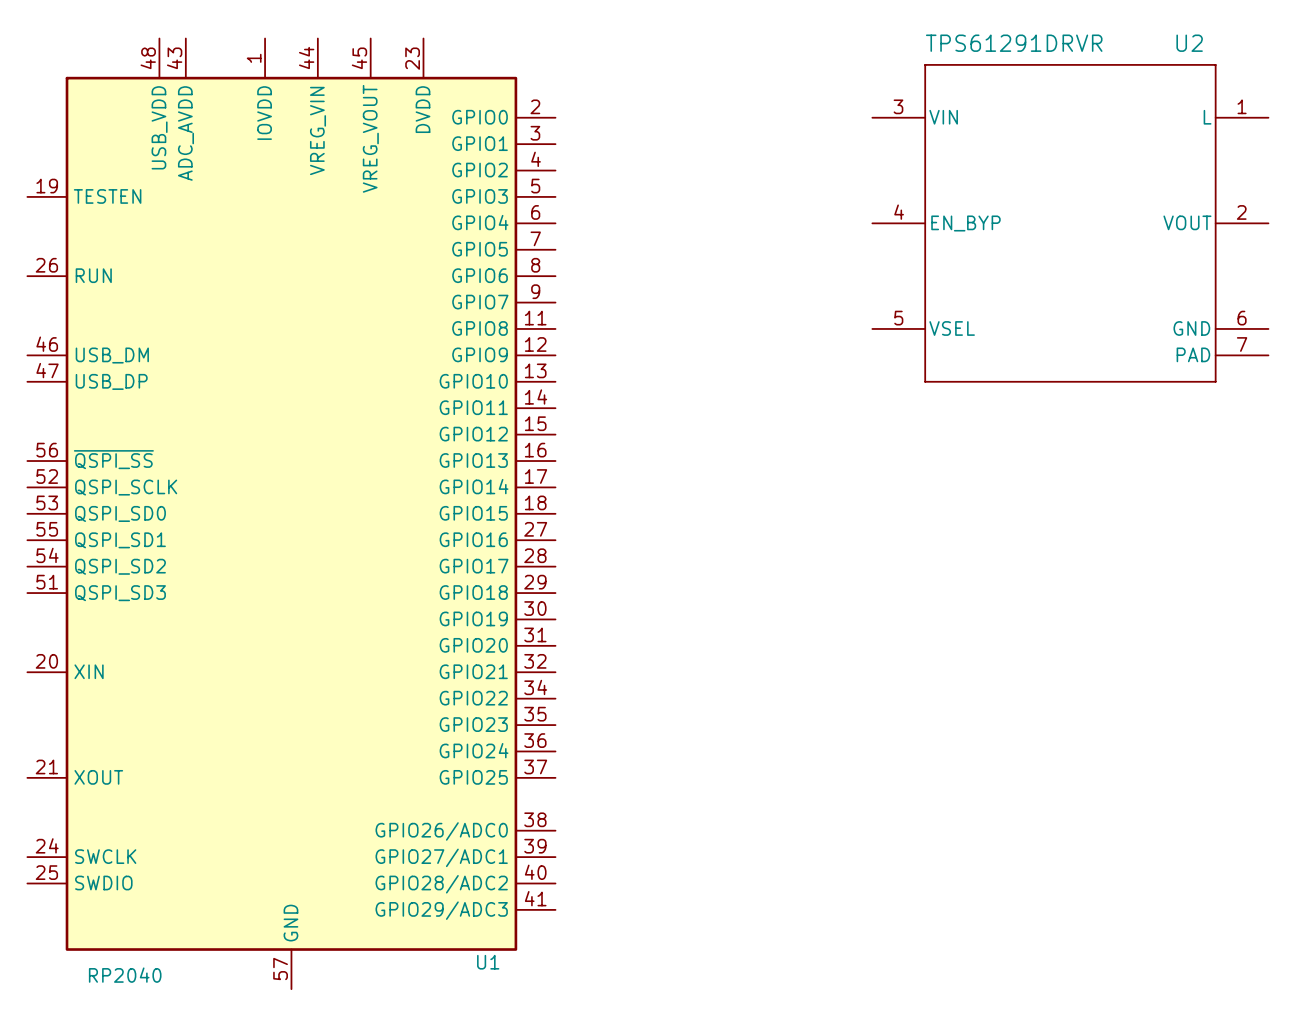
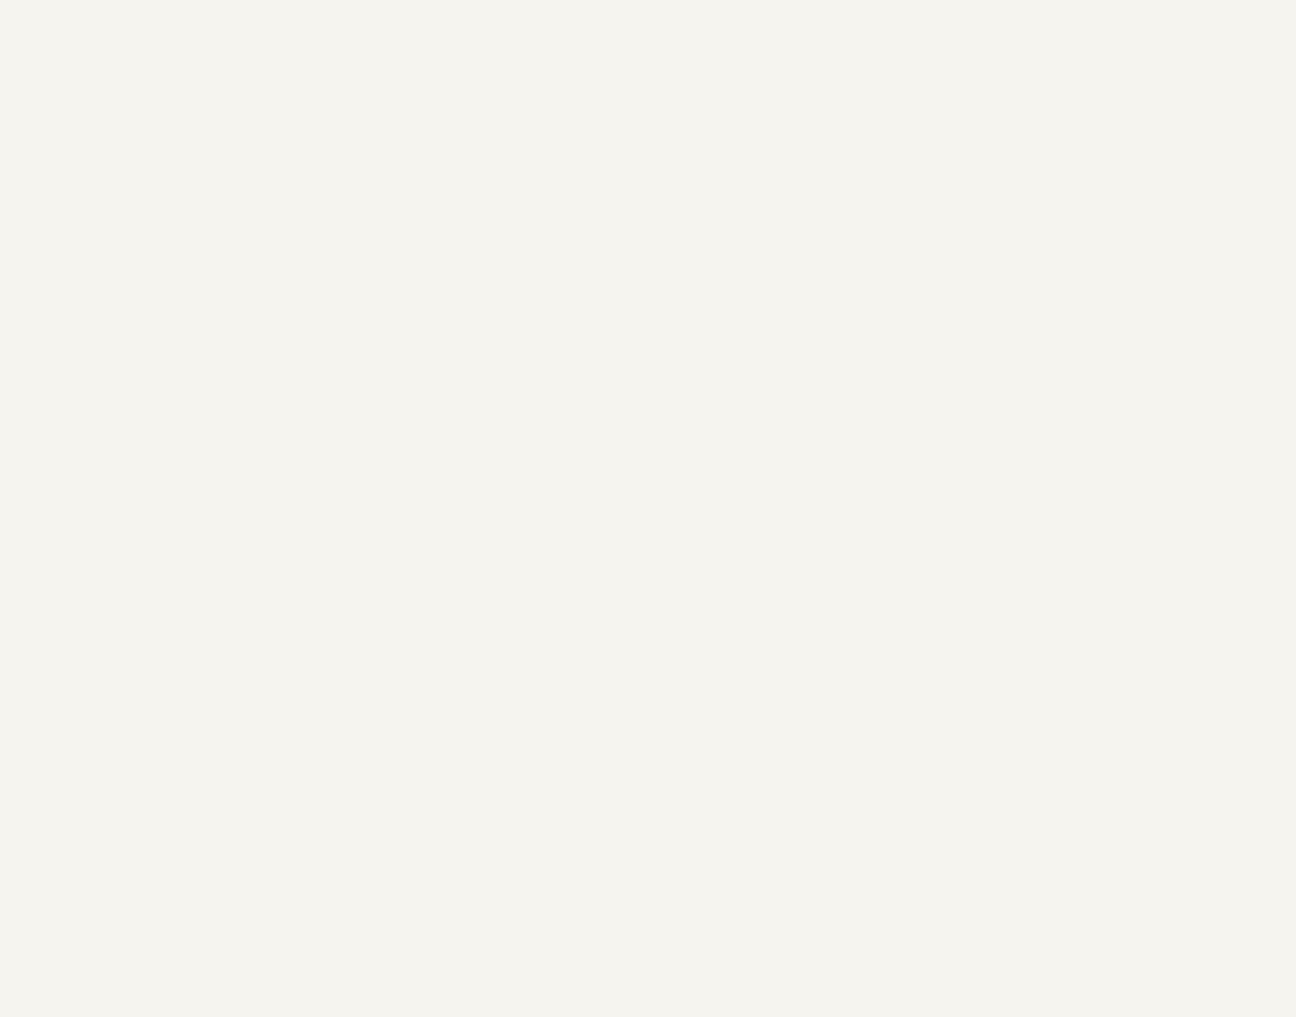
U2: TPS61291DRVR (1070, 223) -> none
U1: RP2040 (291, 513) -> none

